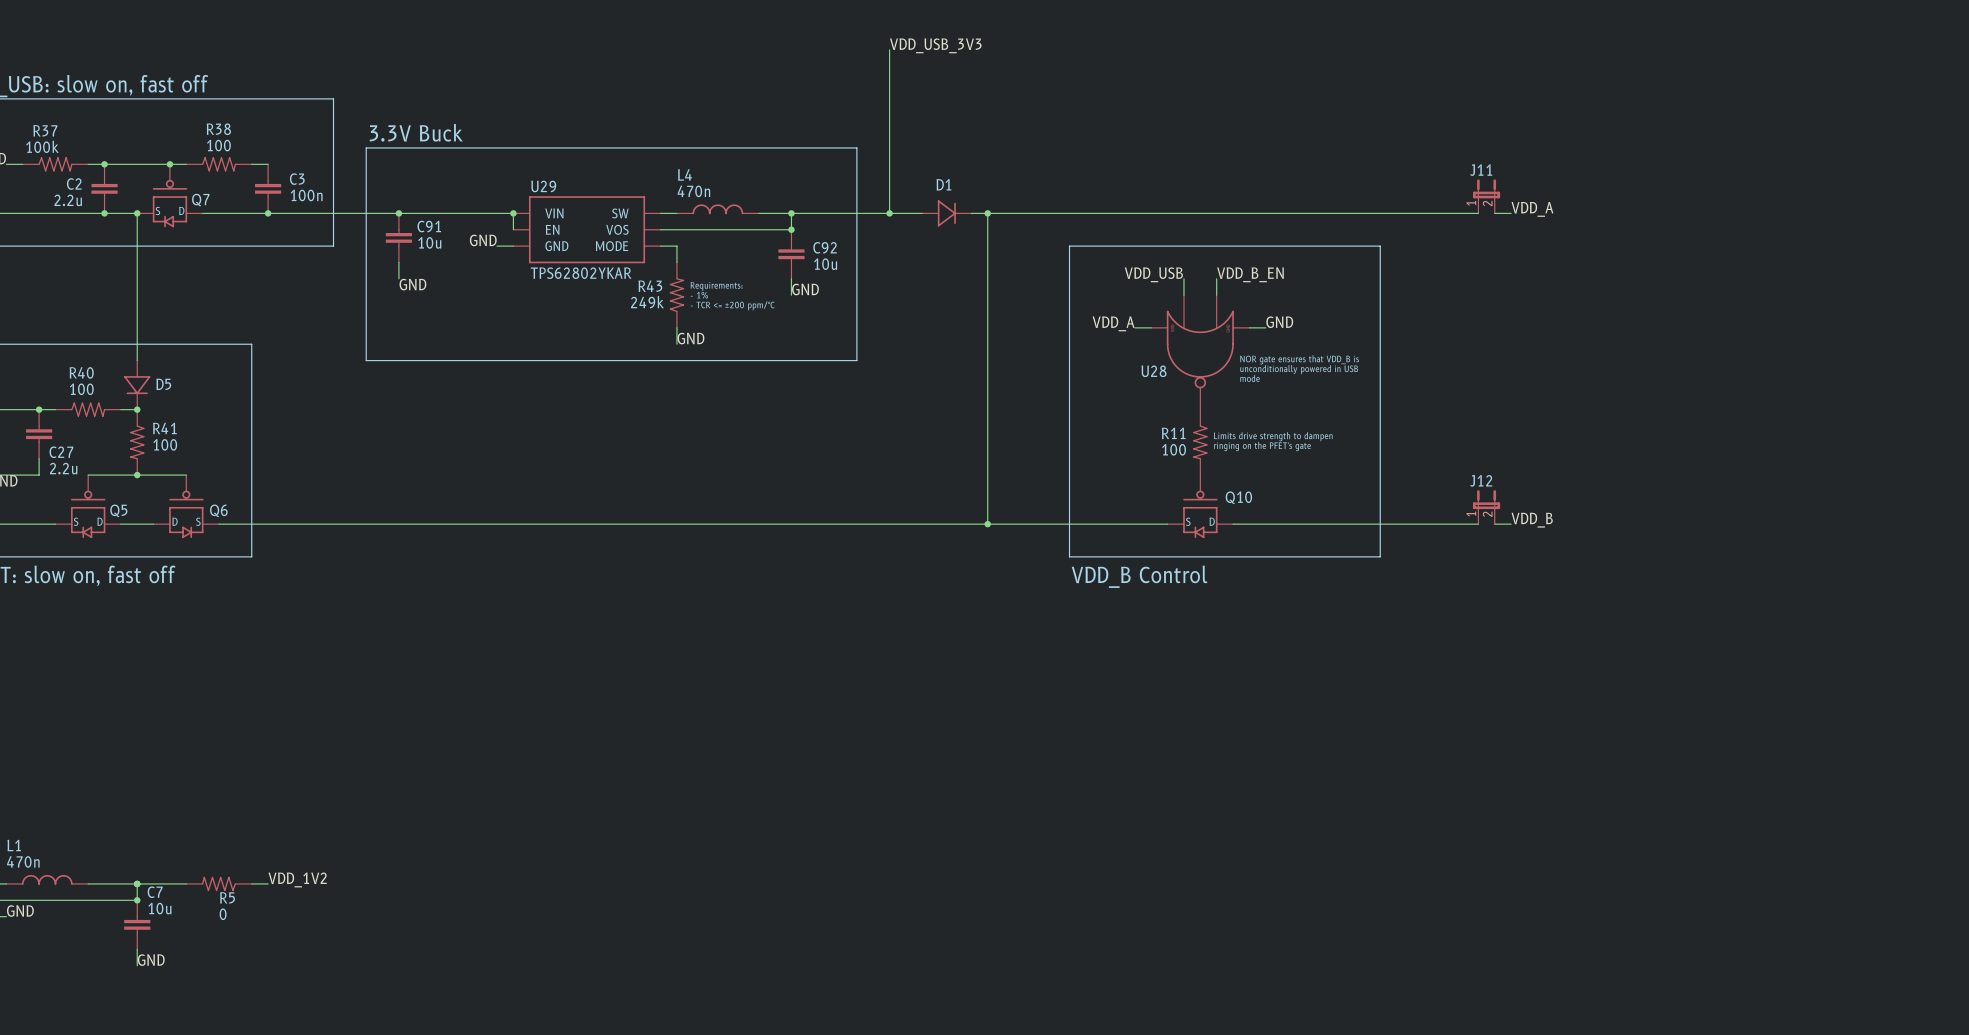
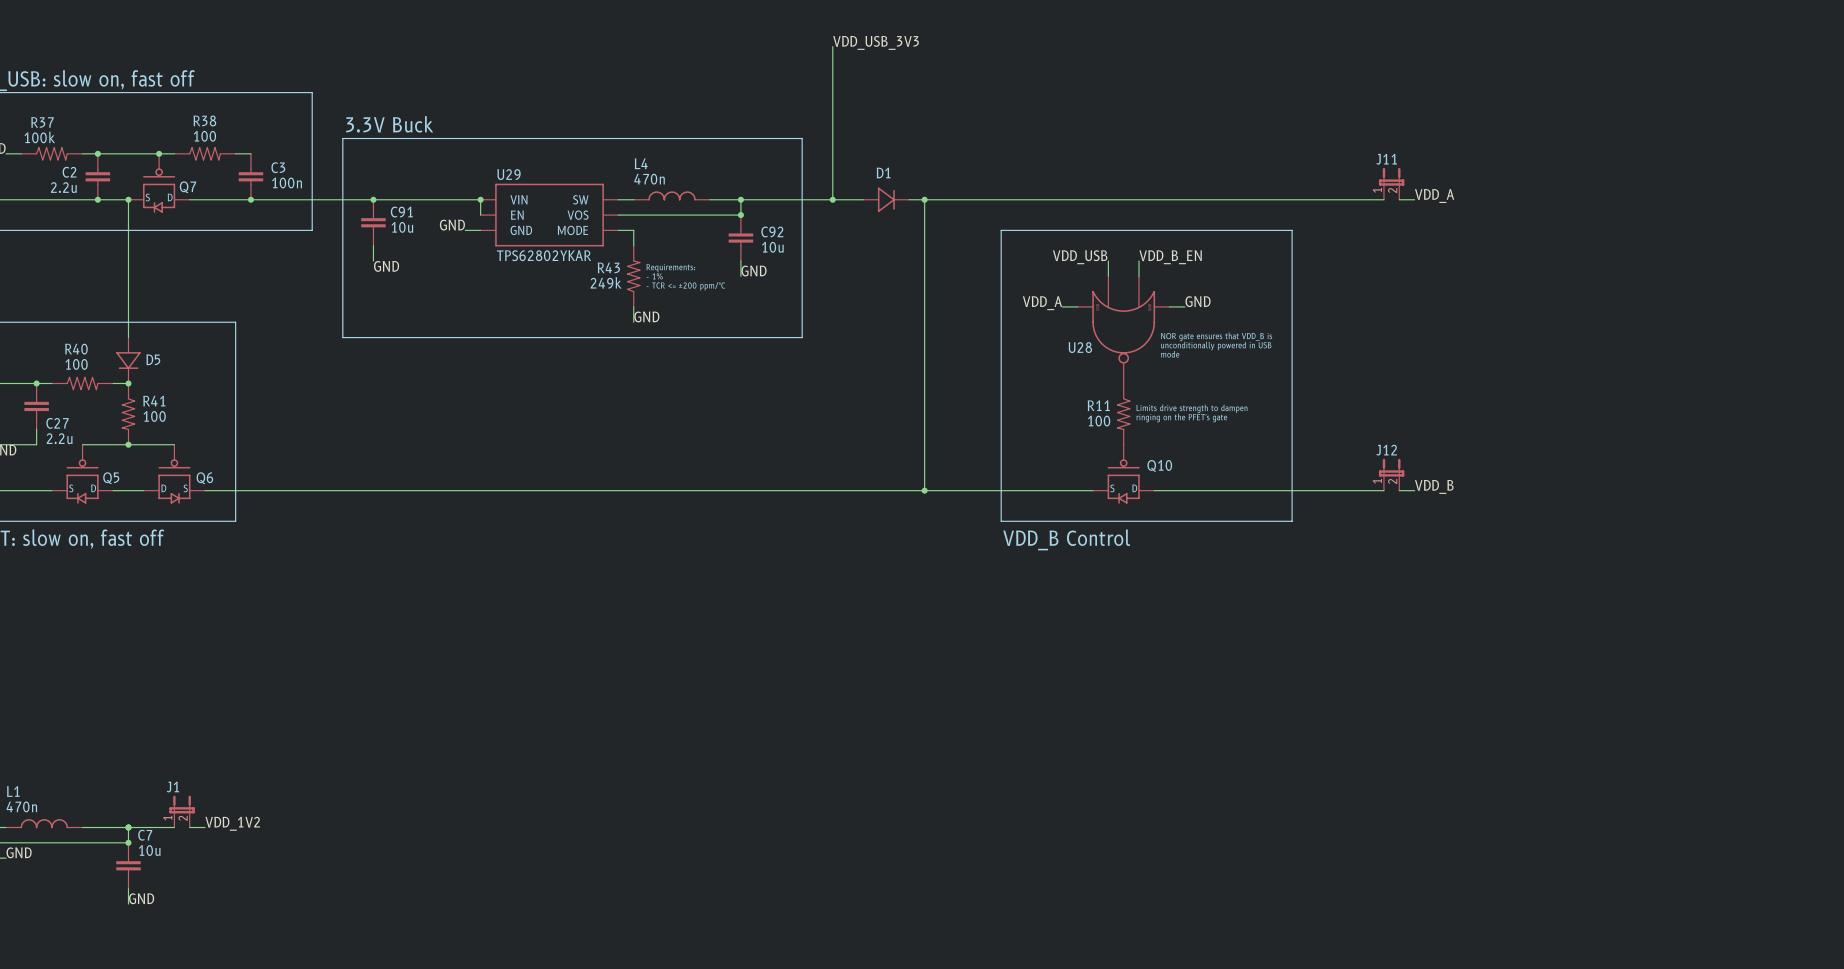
J1: none -> (182, 811)
label position: VDD_1V2 (297, 879) -> VDD_1V2 (232, 823)
R5: 0 (219, 883) -> none
wire: (251, 883) (268, 883) -> (189, 827) (205, 827)

